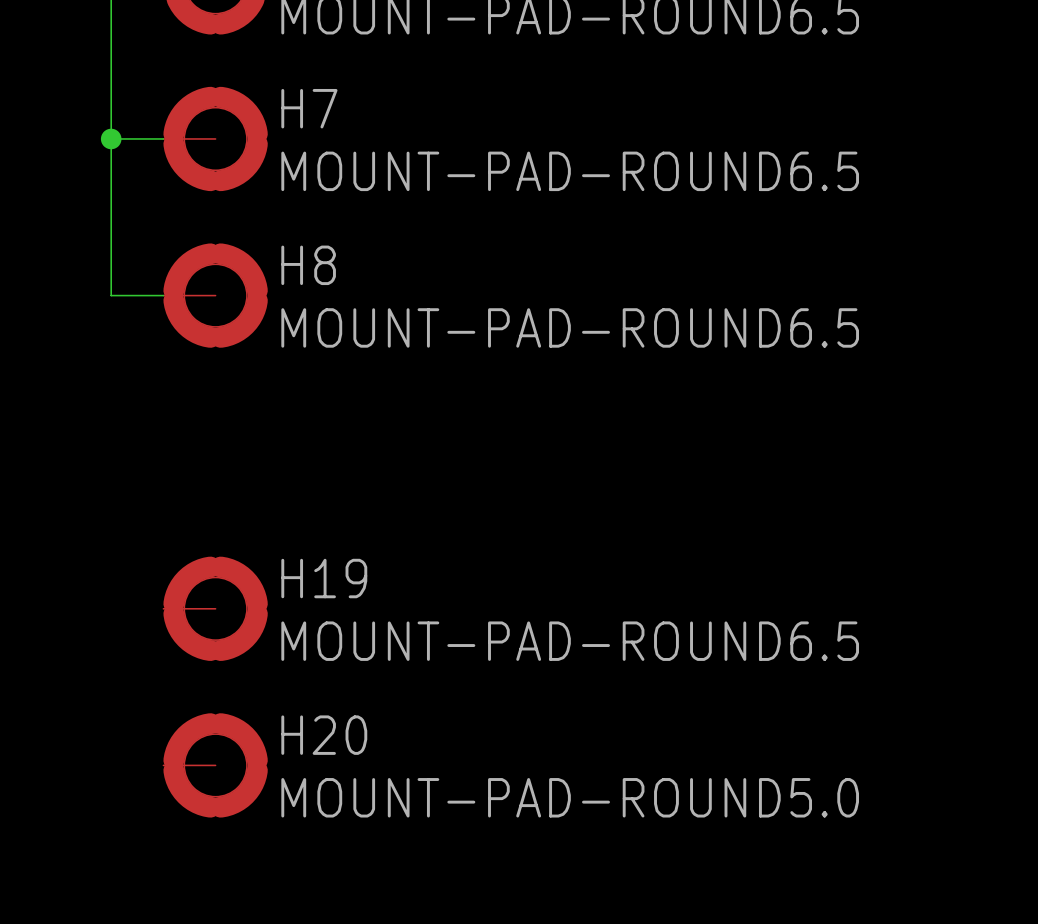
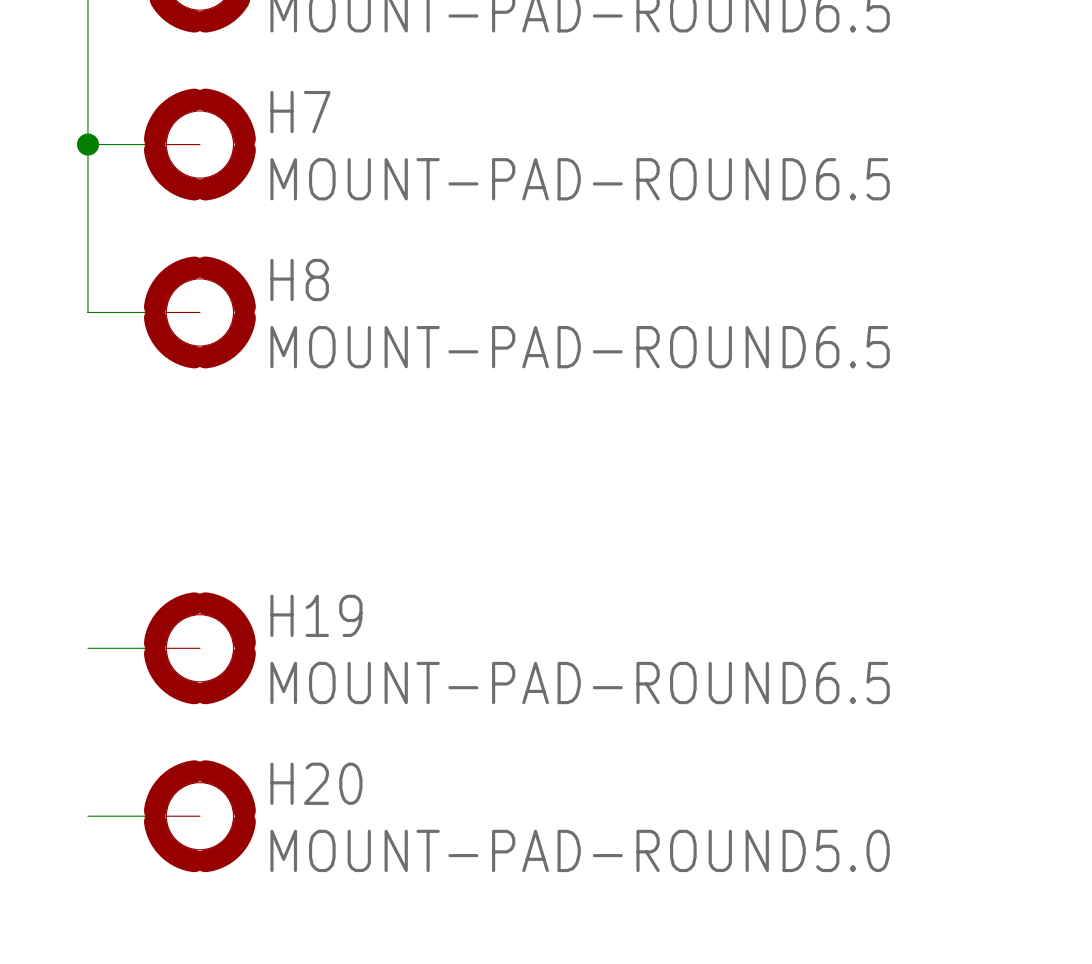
wire: none -> (87, 648) (143, 648)
wire: none -> (87, 816) (143, 816)

